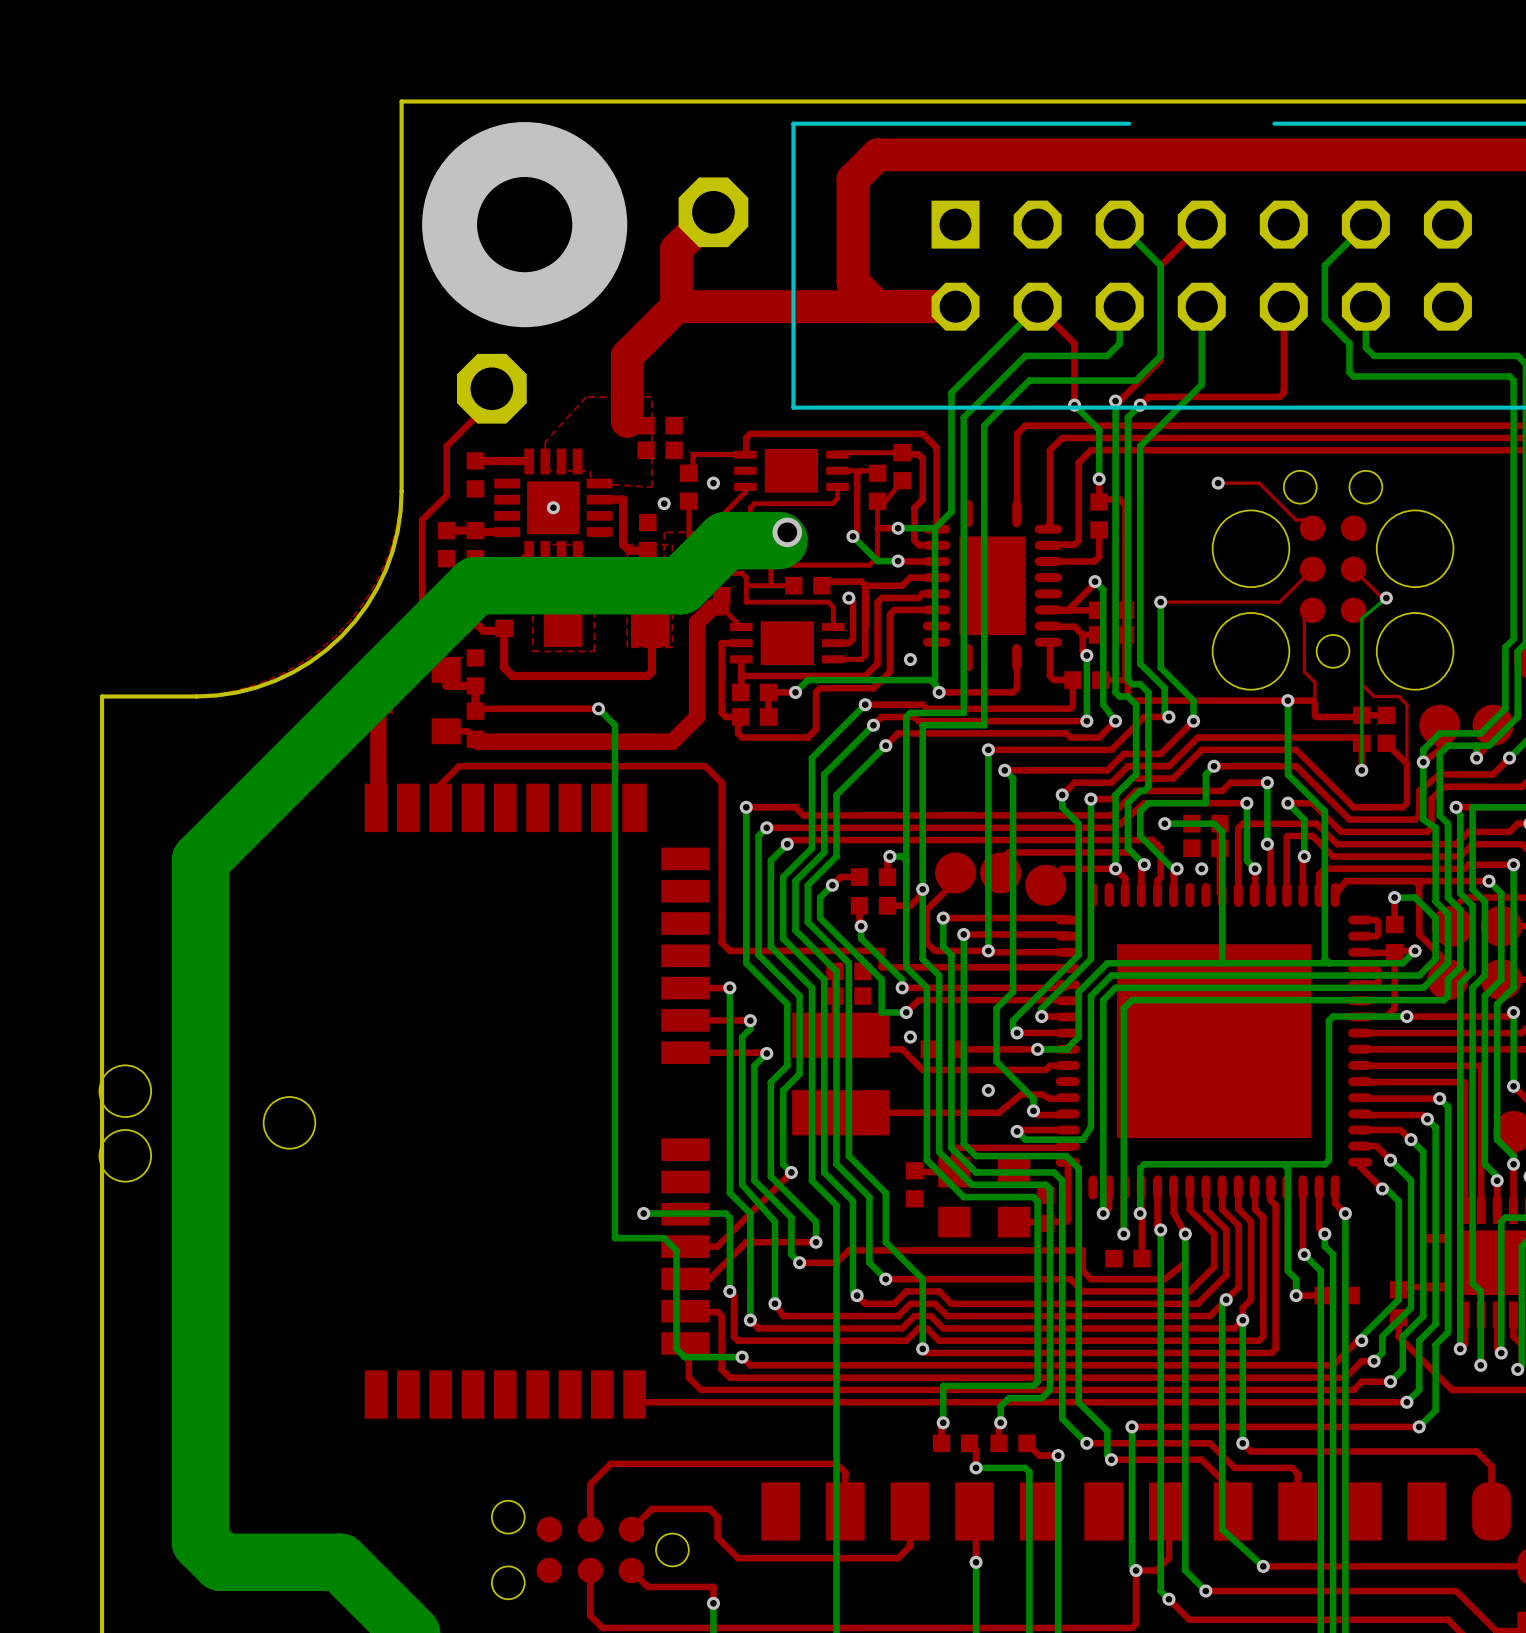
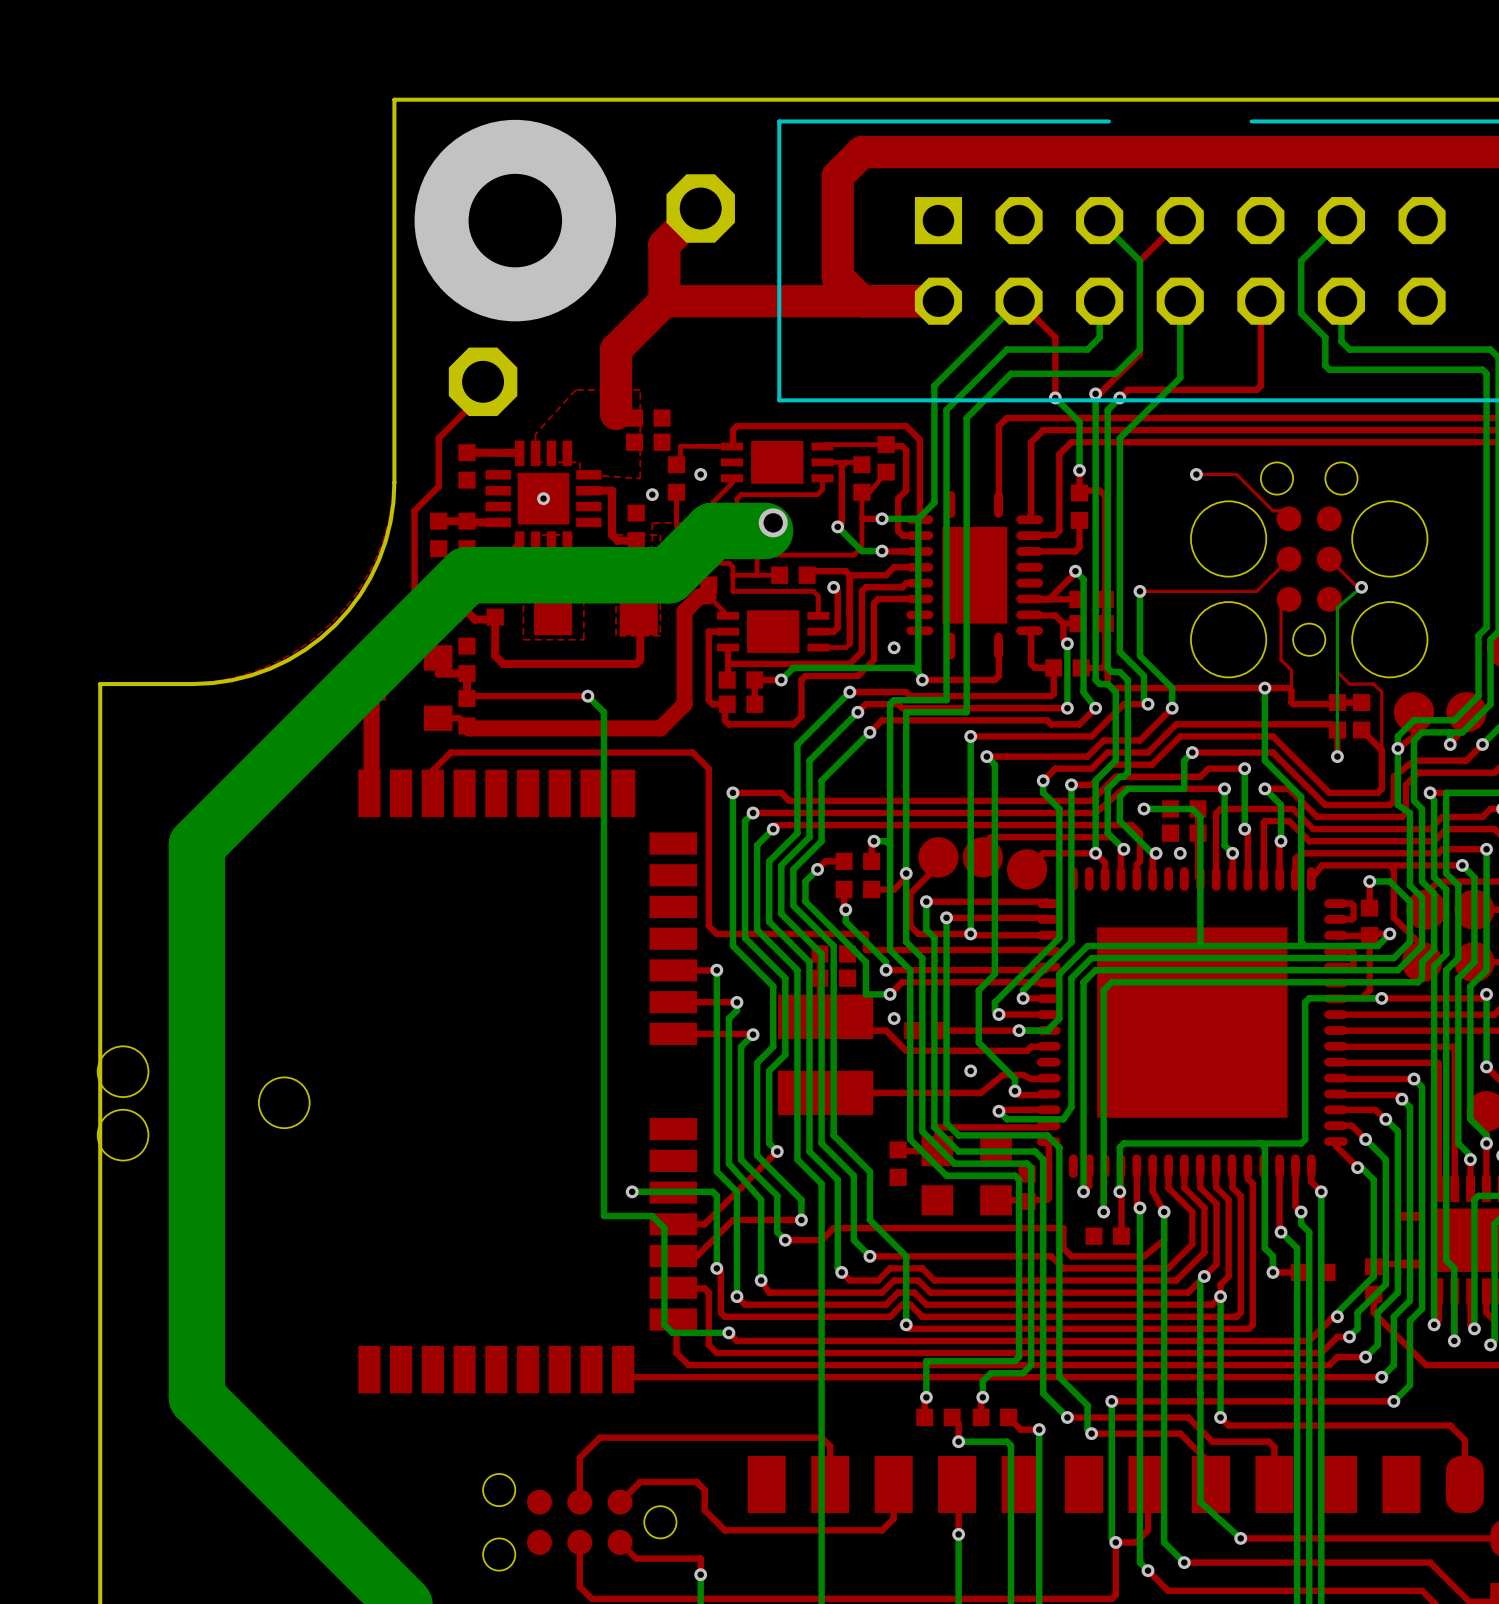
bottom track: (200, 1422) (200, 1541) (221, 1562) (340, 1562) -> (196, 1397) (333, 1534)

